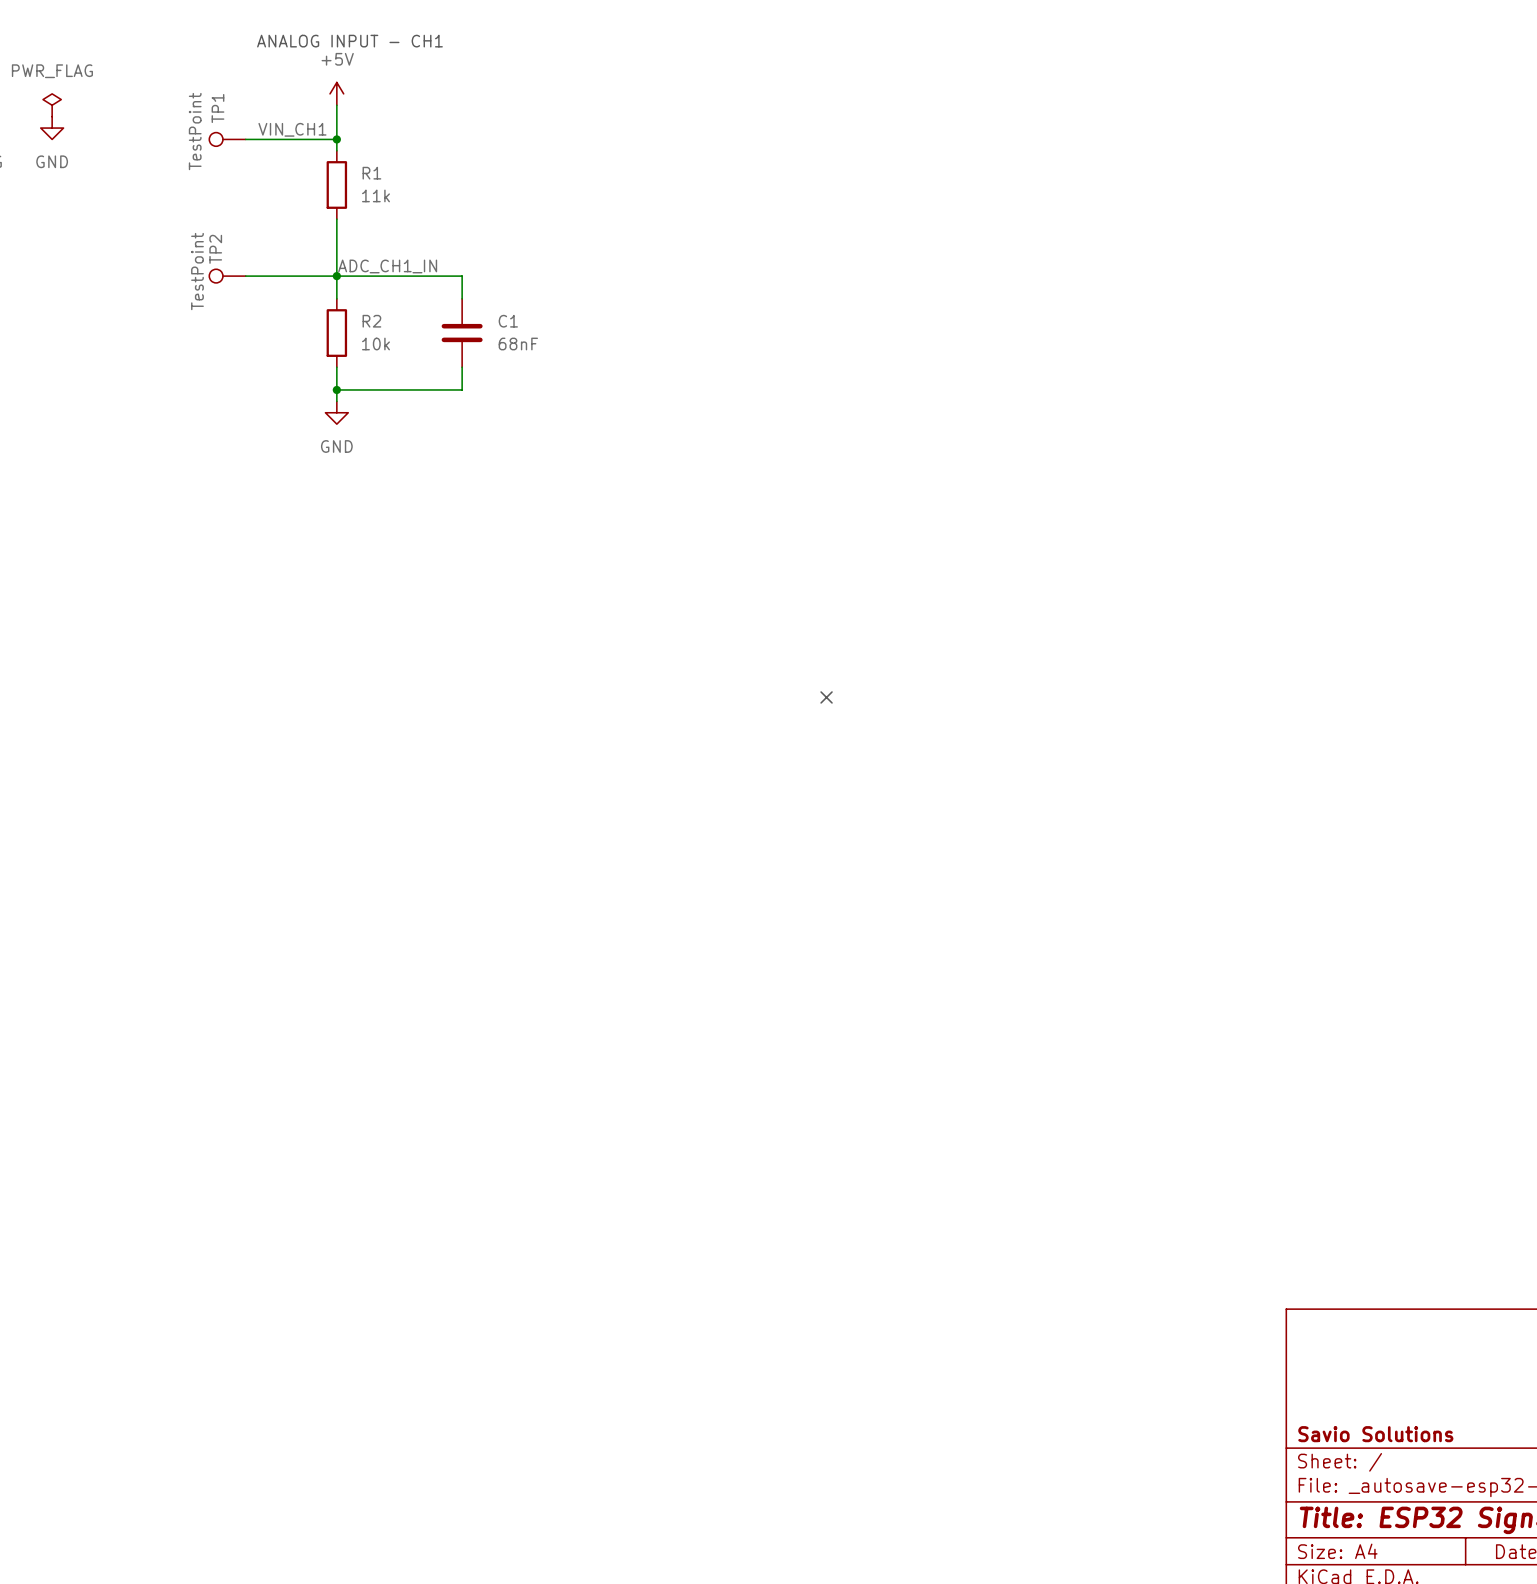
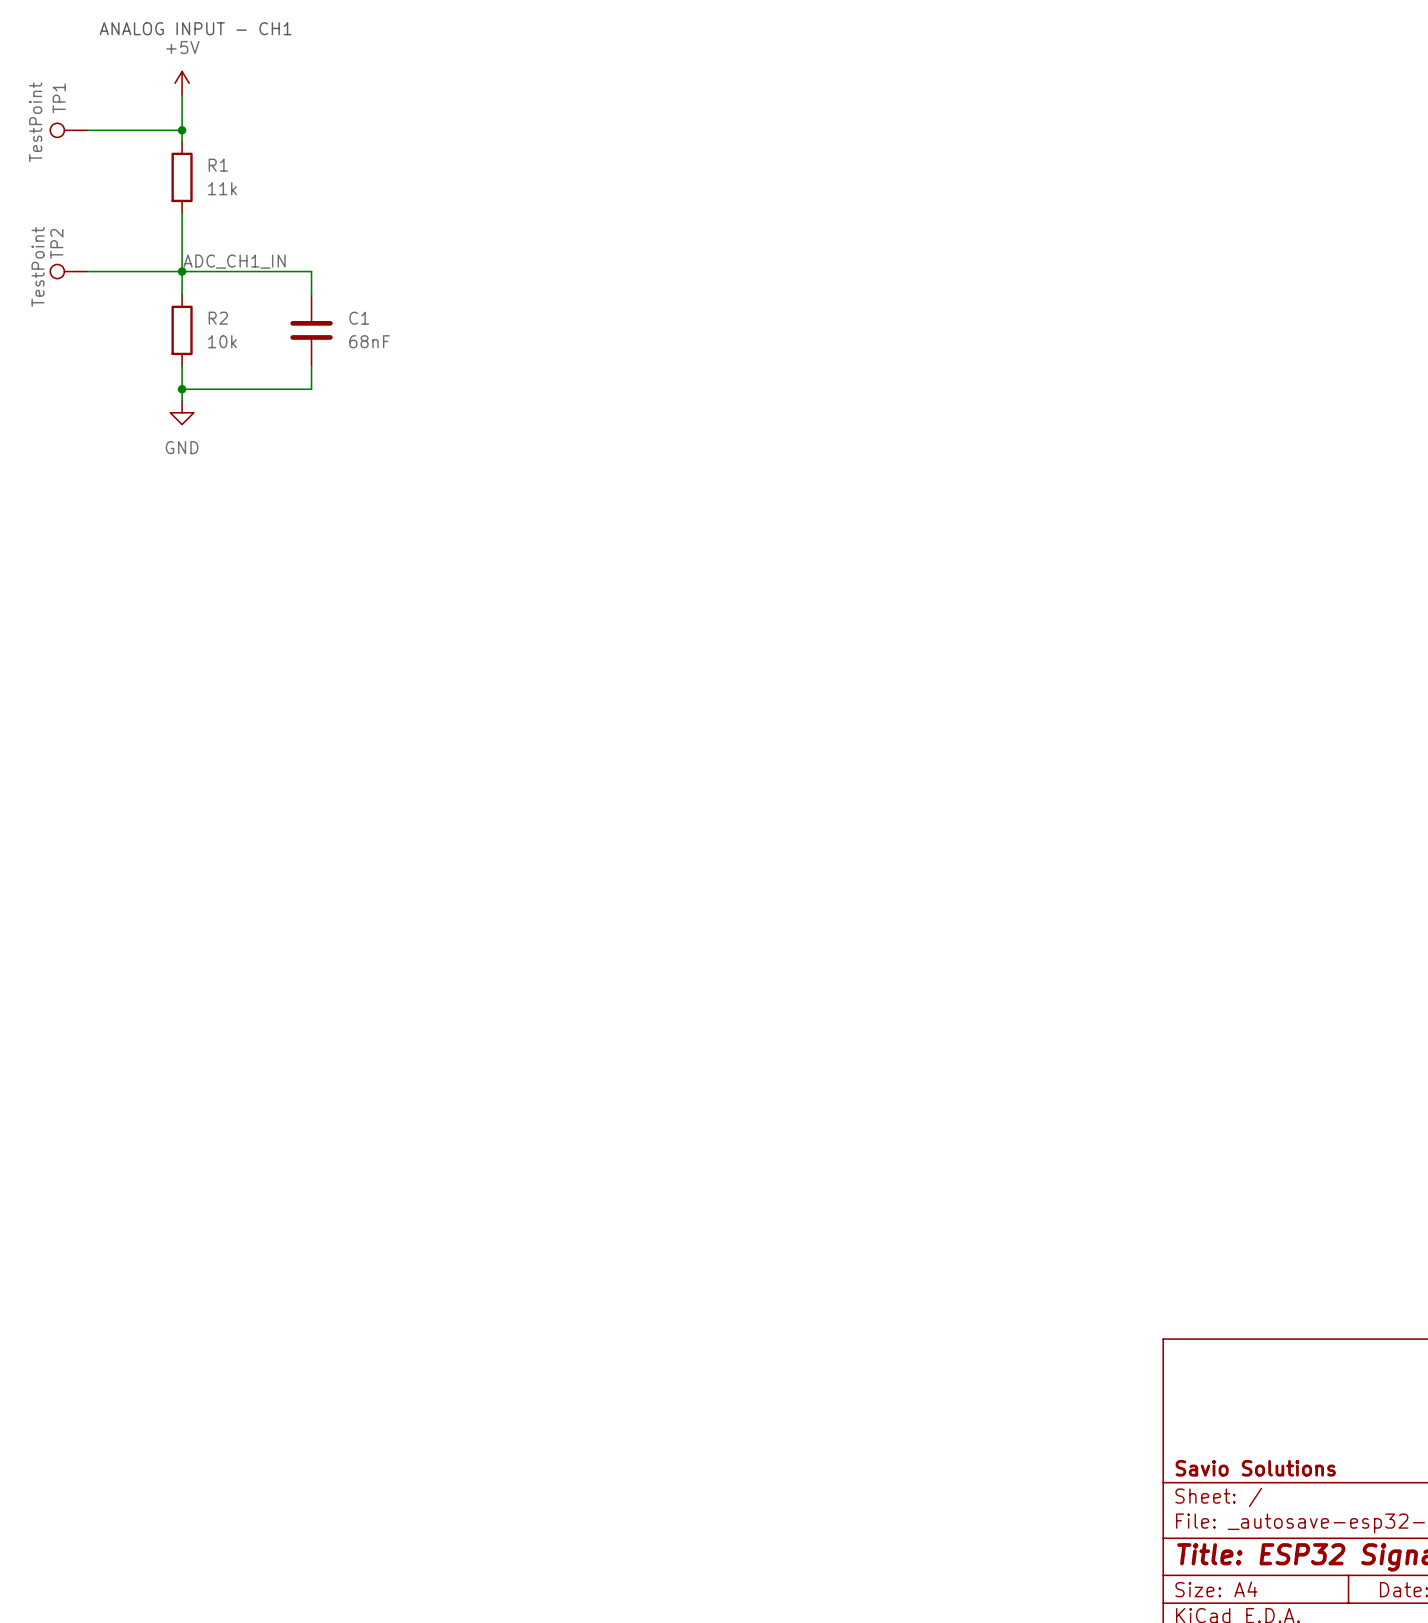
label: VIN_CH1 (292, 129) -> none
no-connect mark: (826, 697) -> none

